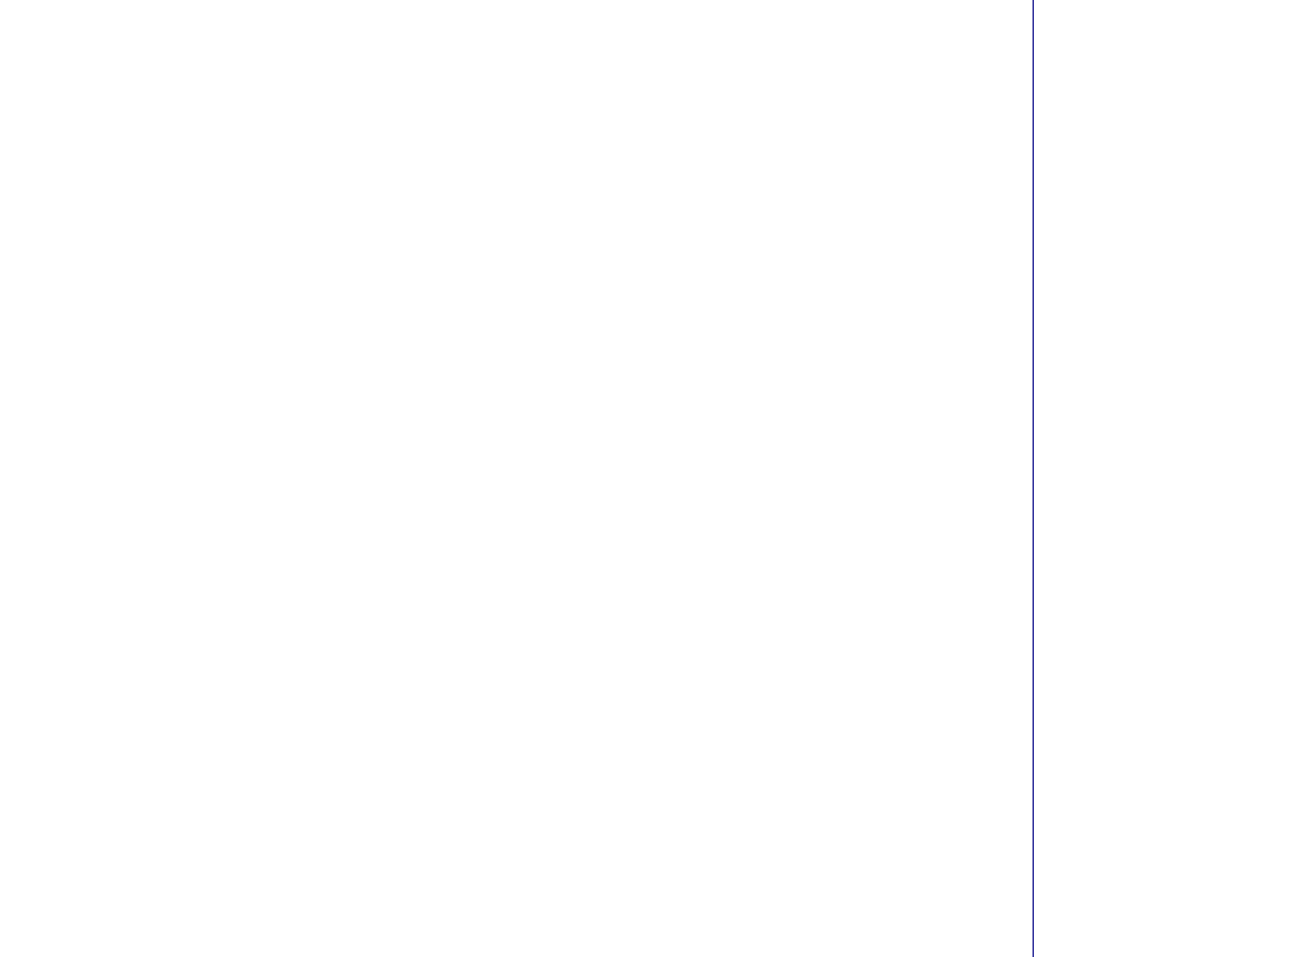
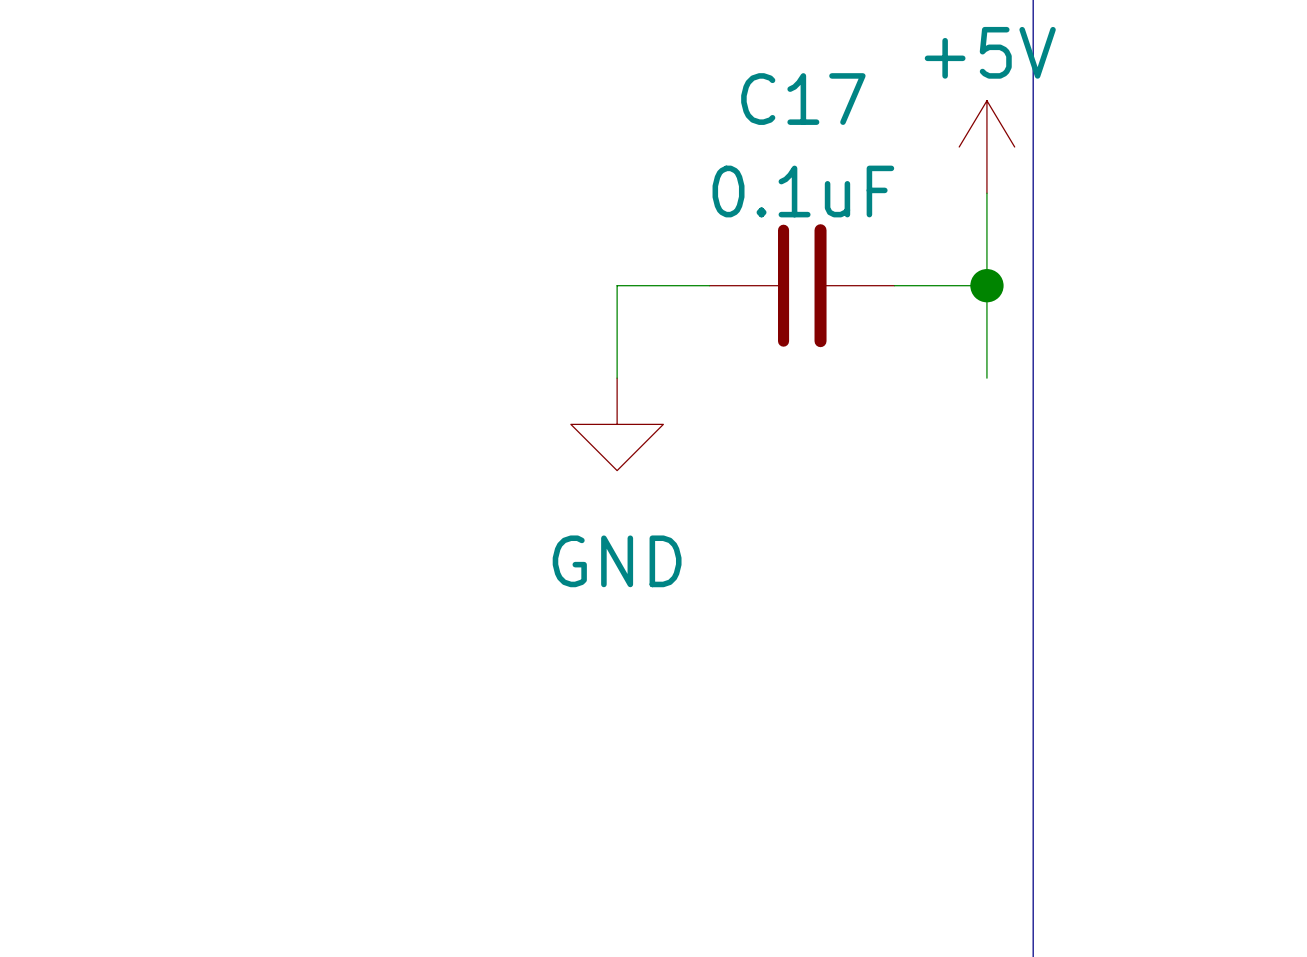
power symbol: none -> +5V (986, 147)
wire: none -> (986, 193) (986, 378)
wire: none -> (709, 285) (617, 285) (617, 378)
C17: none -> 0.1uF (802, 285)
wire: none -> (894, 285) (986, 285)
junction: none -> (986, 285)
power symbol: none -> GND (617, 424)

